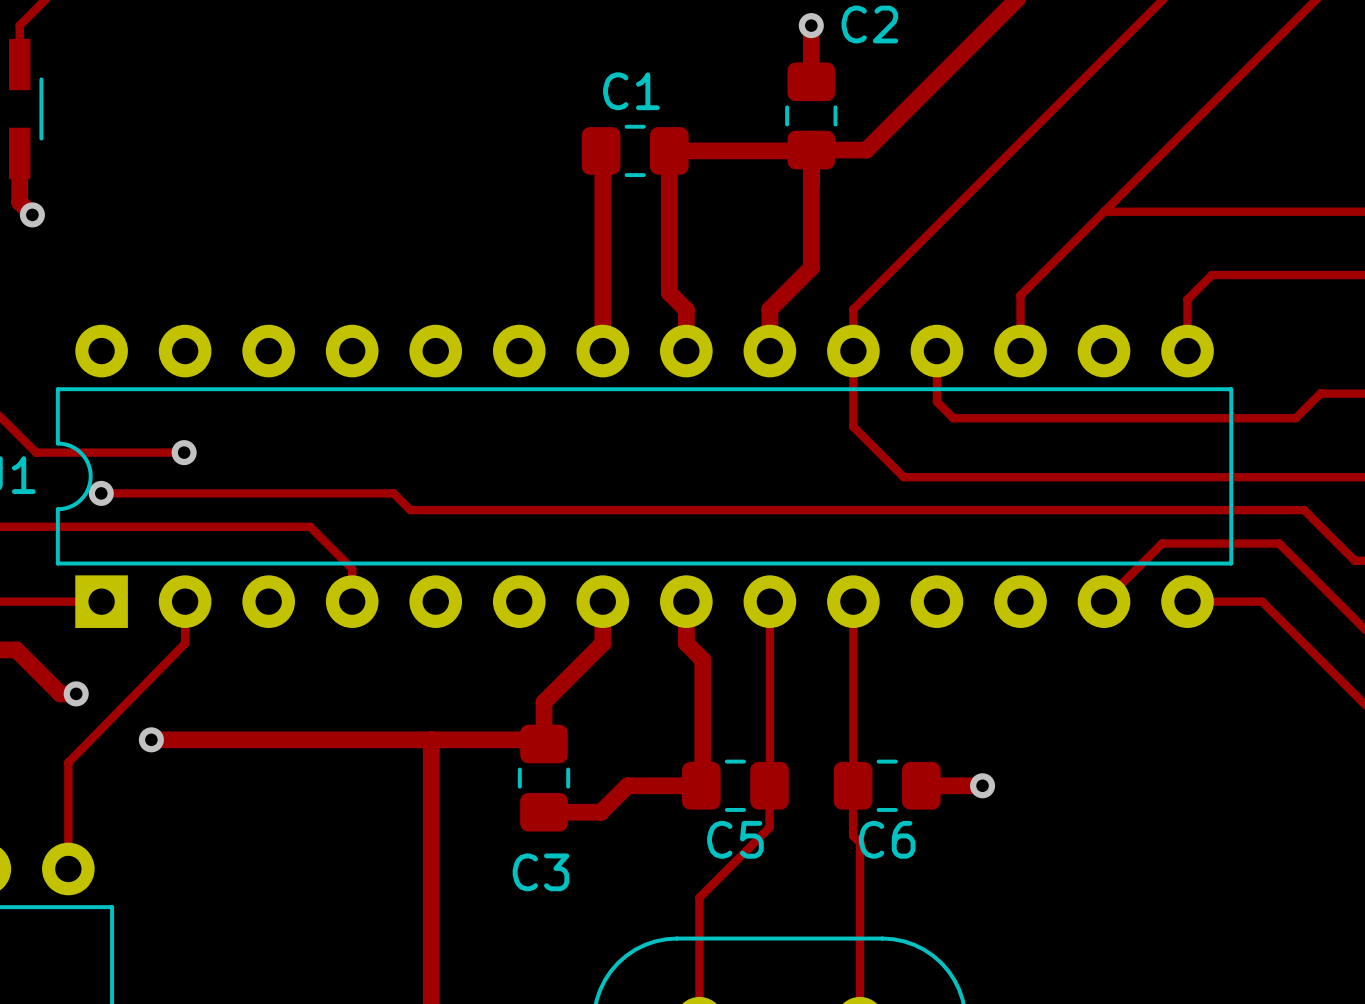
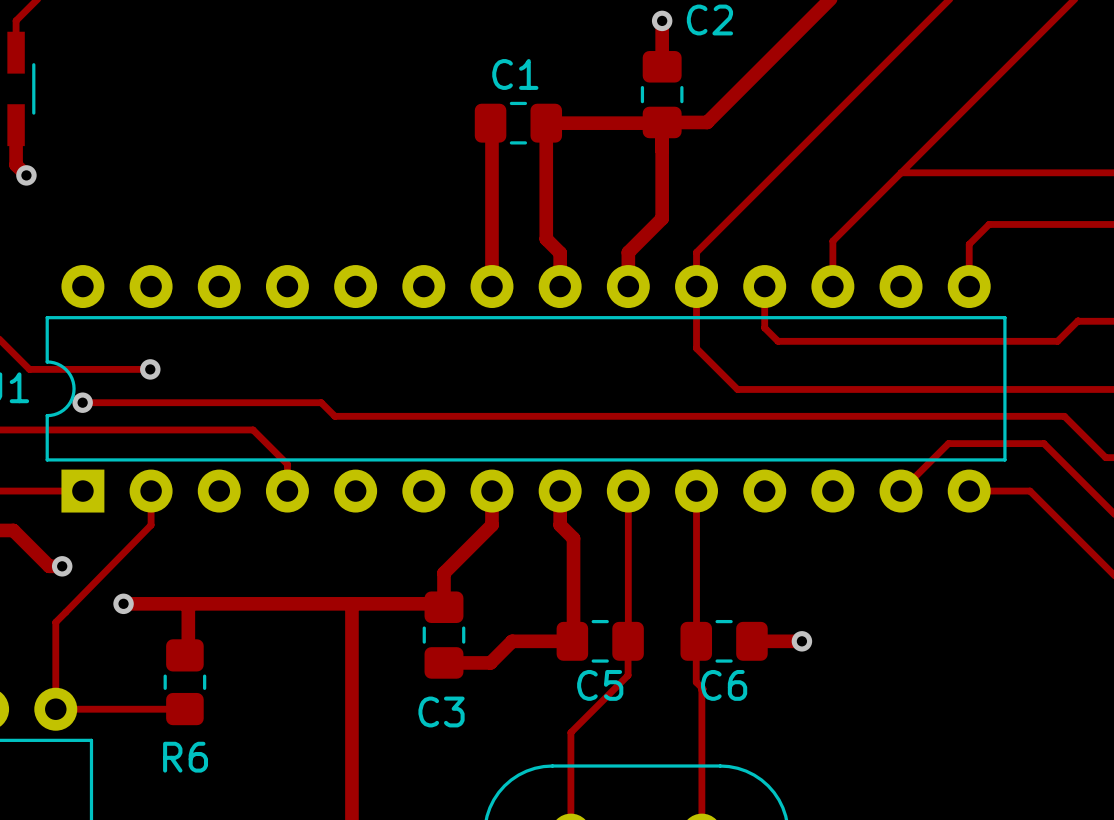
track: none -> (188, 603) (188, 651) (184, 655)
R6: none -> (184, 682)
track: none -> (55, 709) (184, 709)

